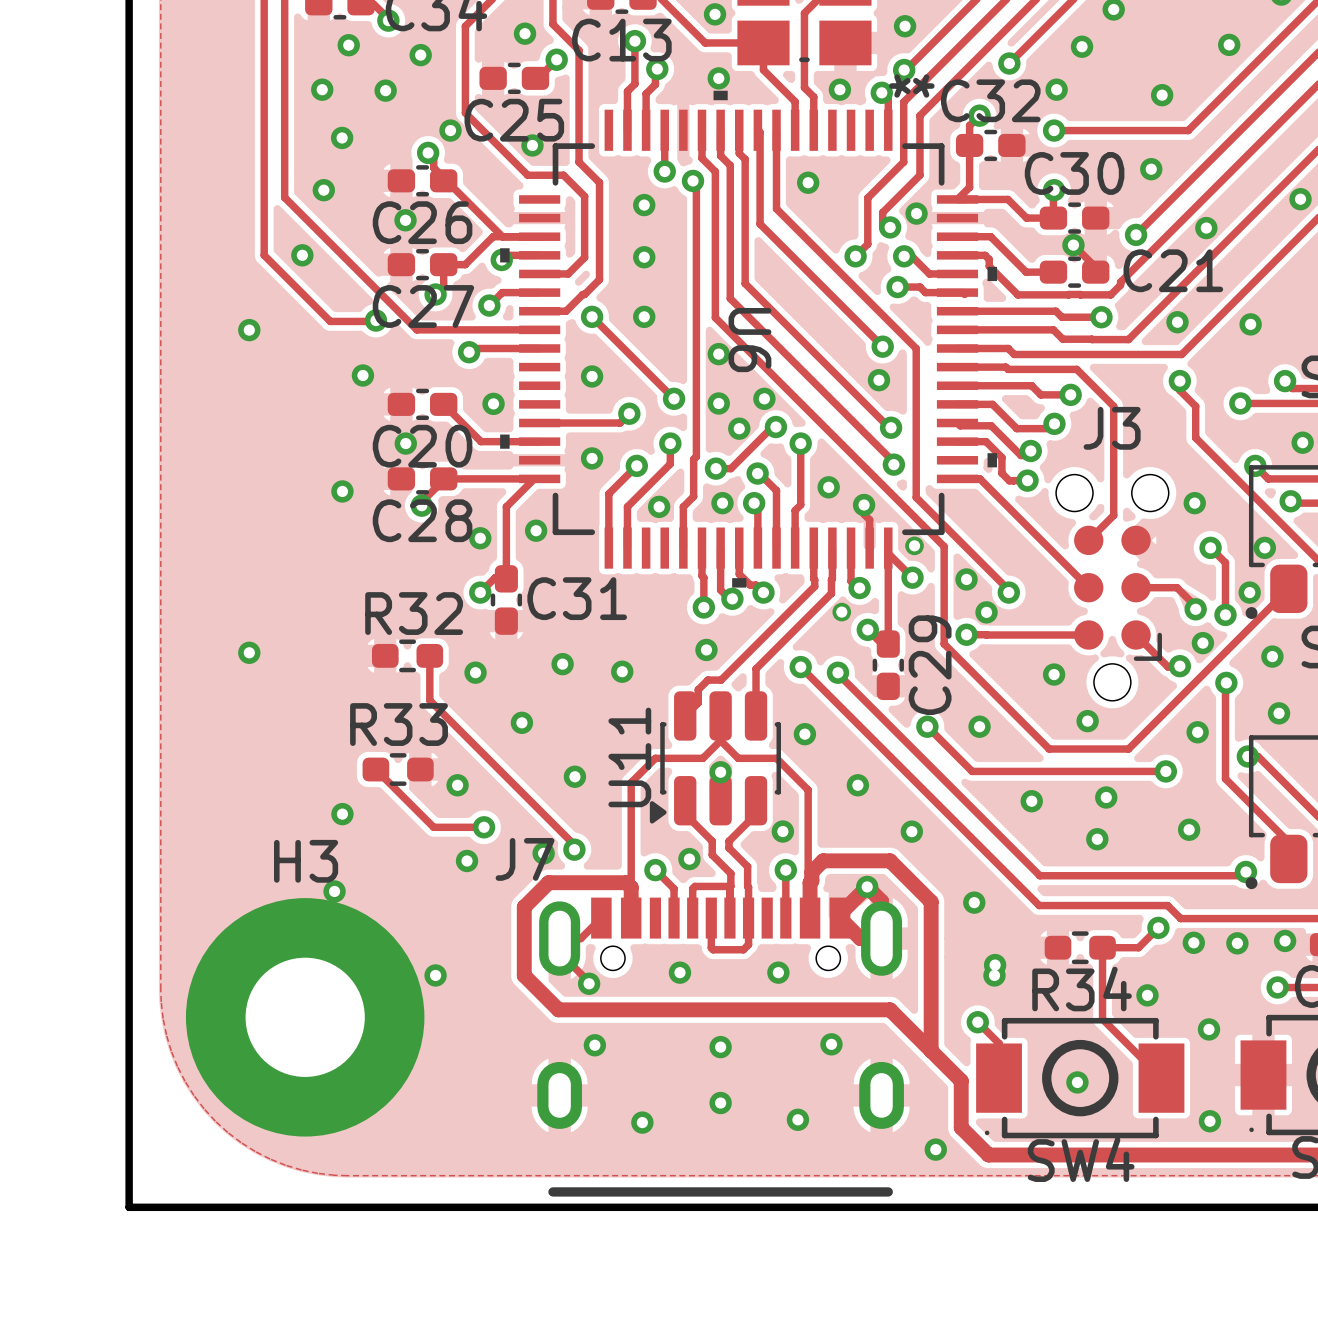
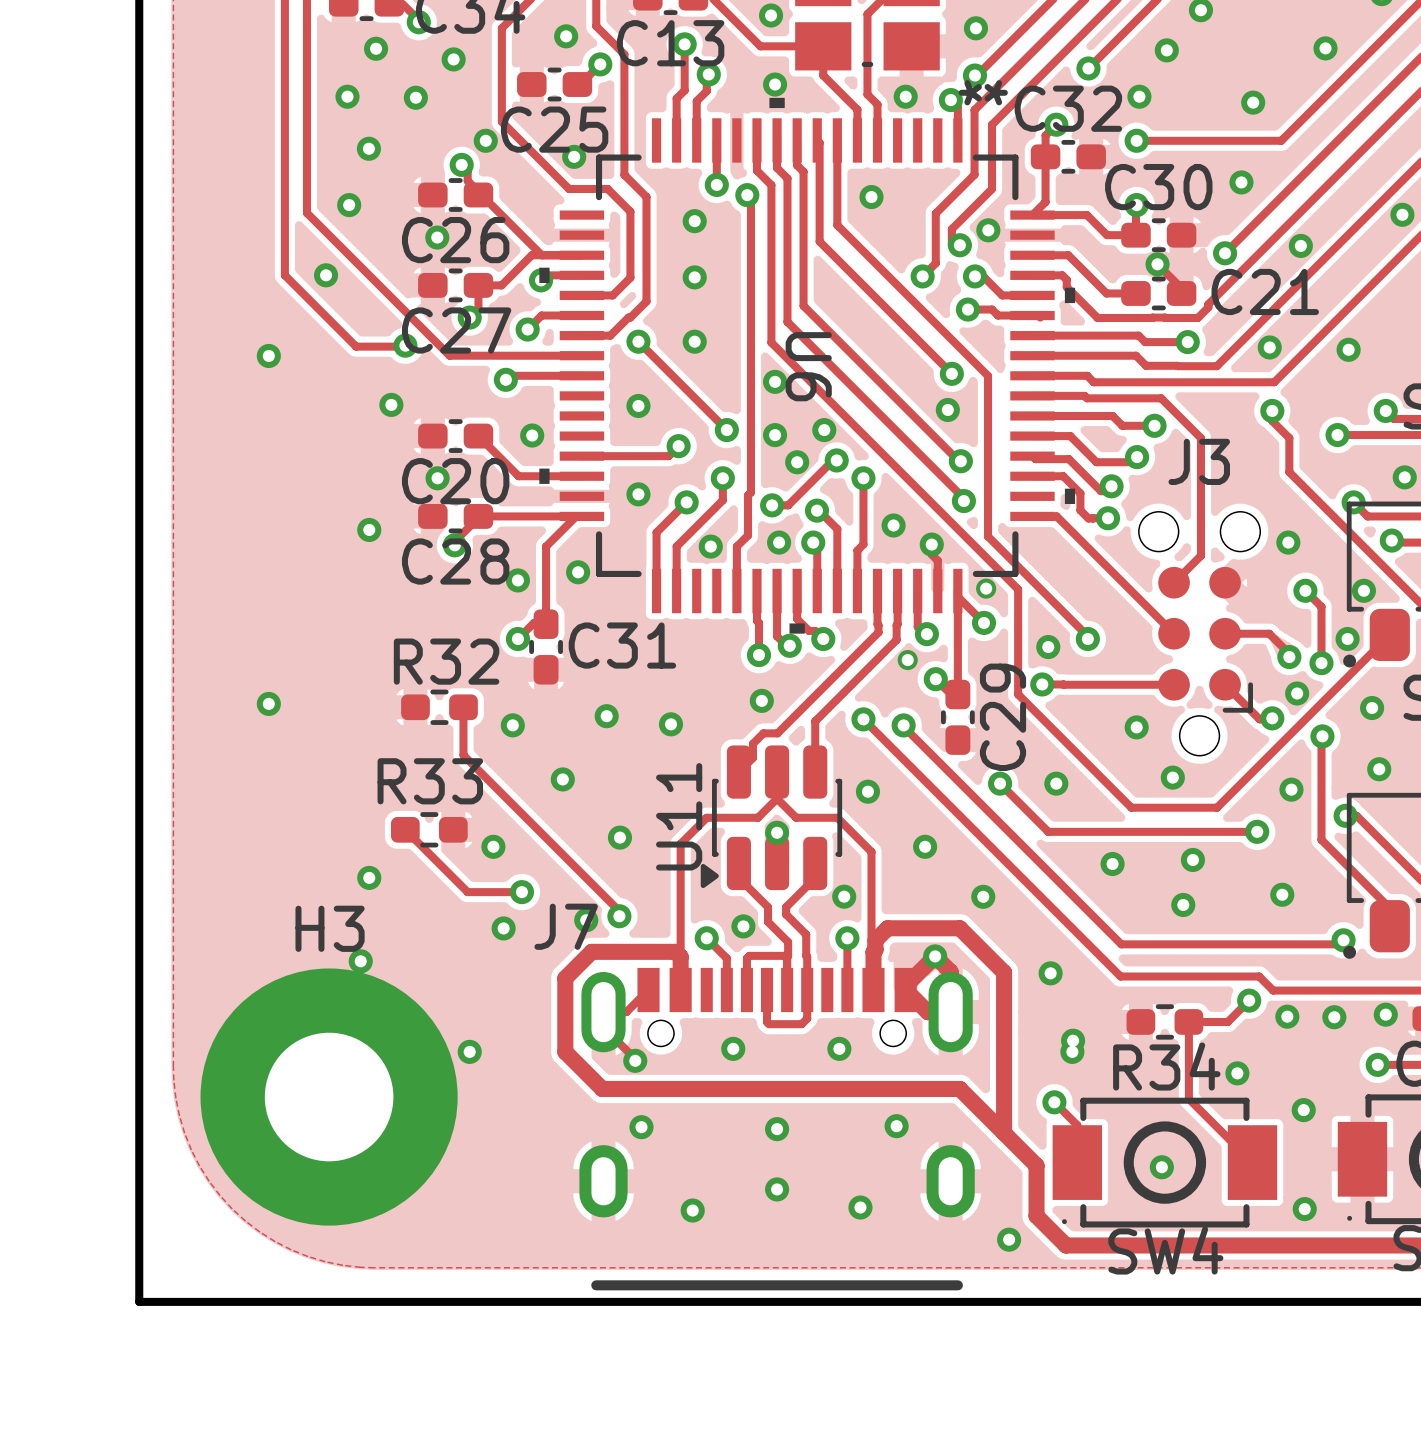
via: (966, 579) -> none
via: none -> (1048, 647)
via: (986, 612) -> none

